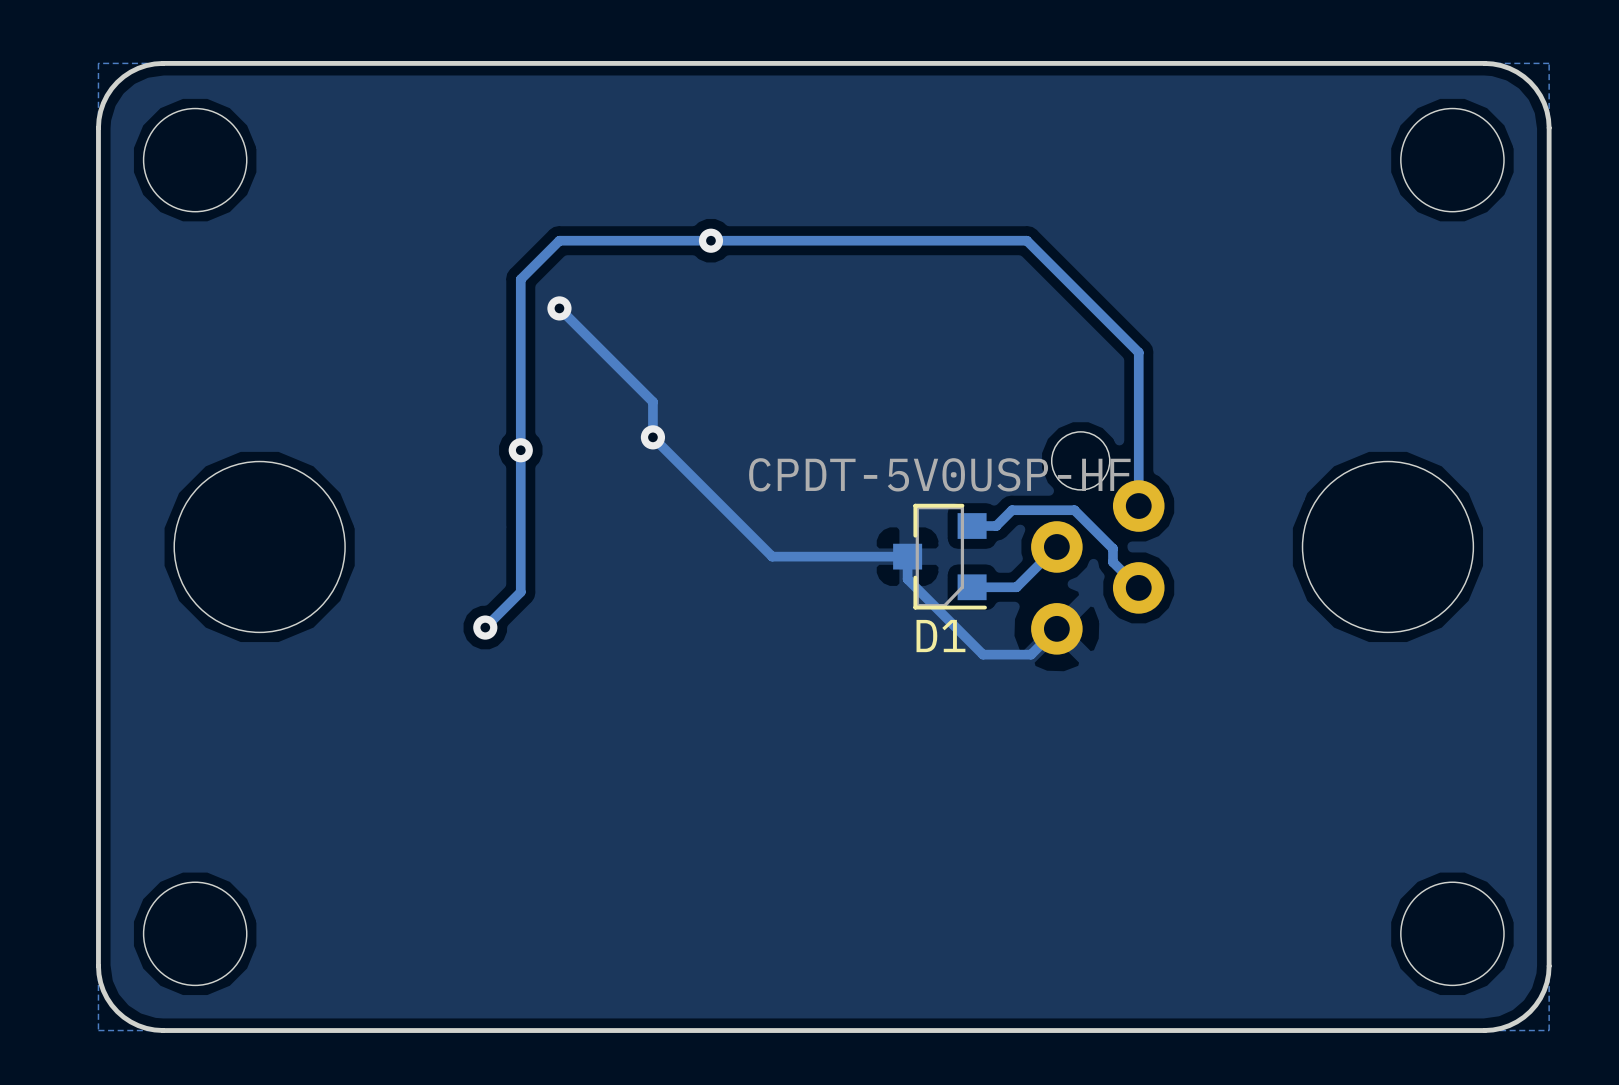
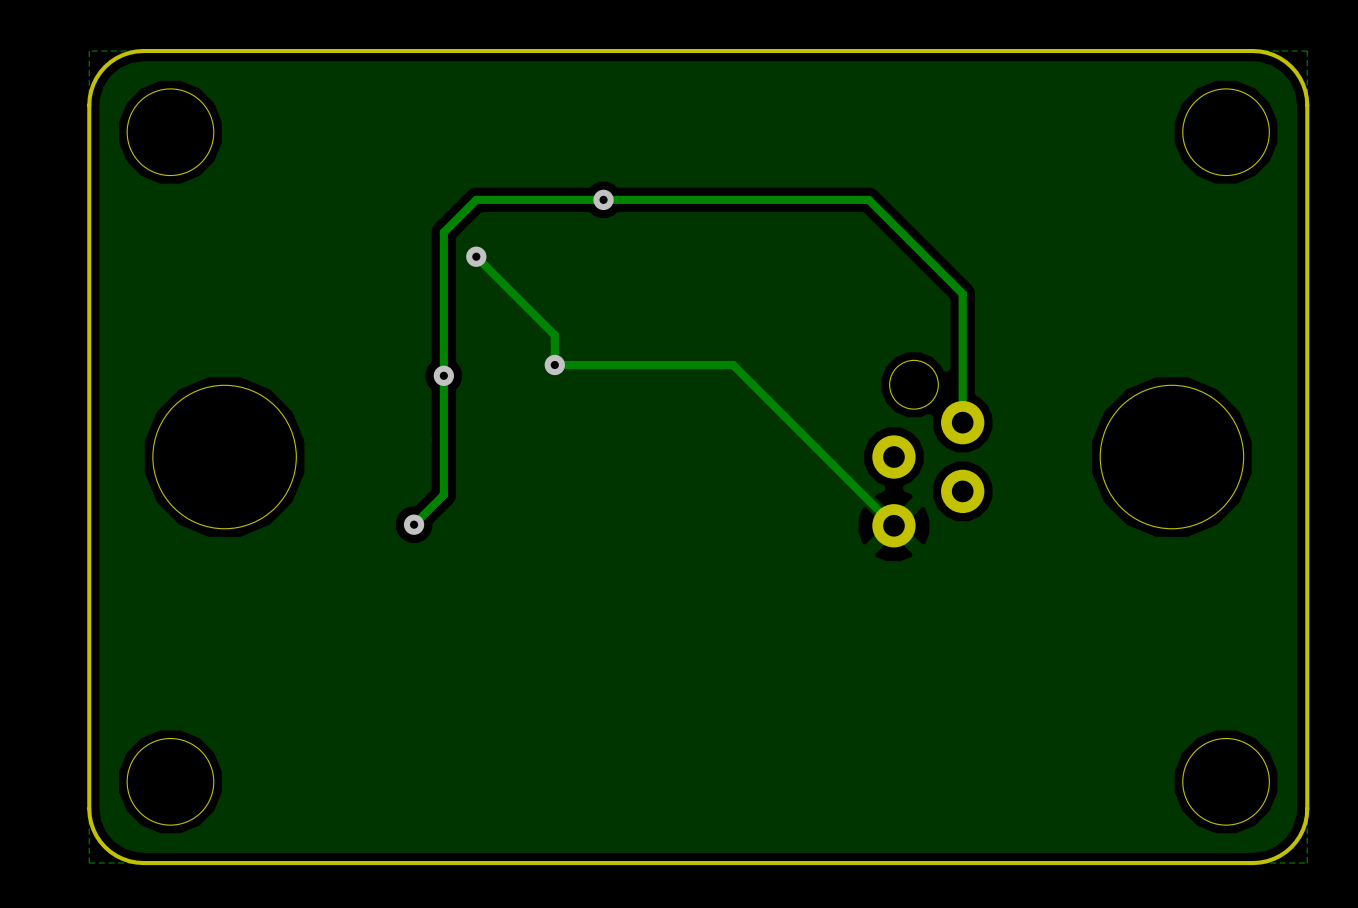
track: (652, 437) (772, 556) (907, 556) (907, 579) (983, 654) (1031, 654) (1056, 628) -> (554, 364) (733, 364) (893, 525)
track: (972, 526) (996, 526) (1012, 510) (1074, 510) (1112, 548) (1112, 562) (1138, 587) -> none
track: (1056, 546) (1016, 587) (972, 587) -> none
D1: CPDT-5V0USP-HF (940, 556) -> none

